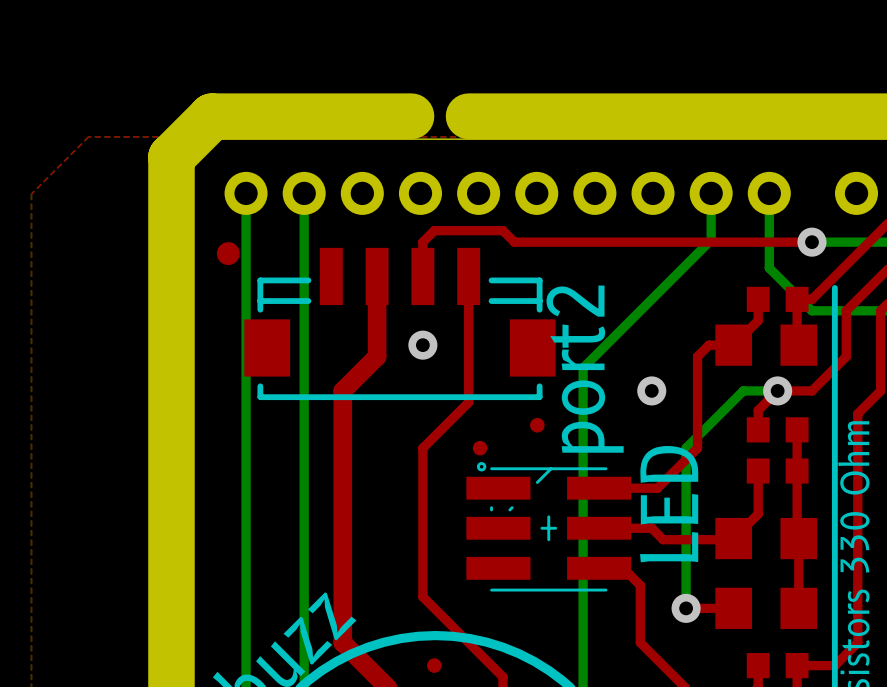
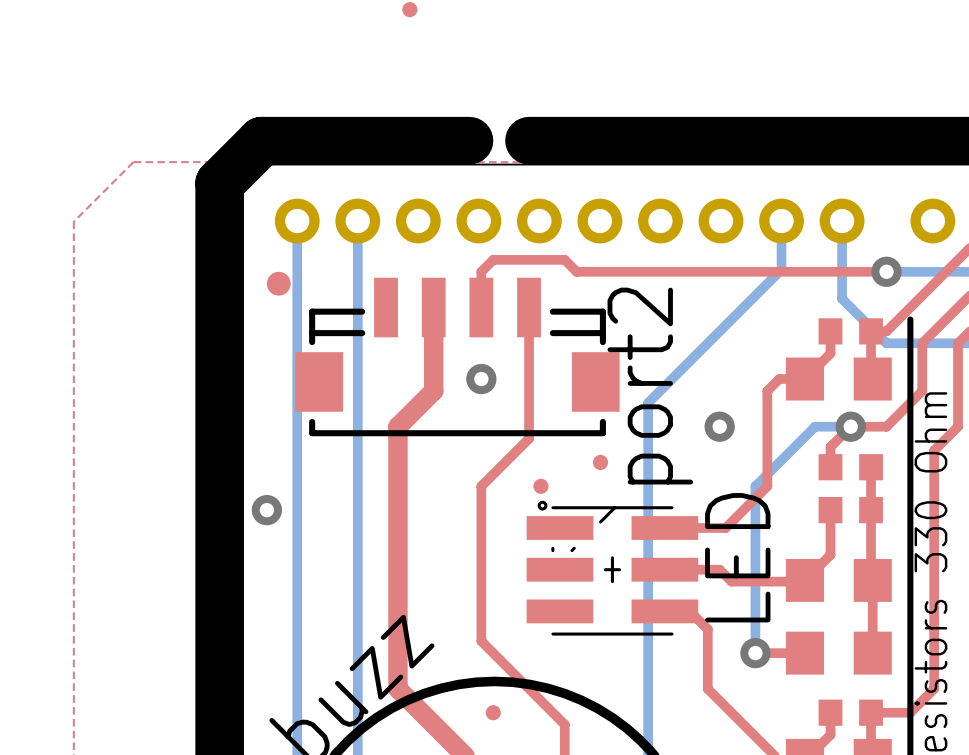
via: none -> (266, 510)

